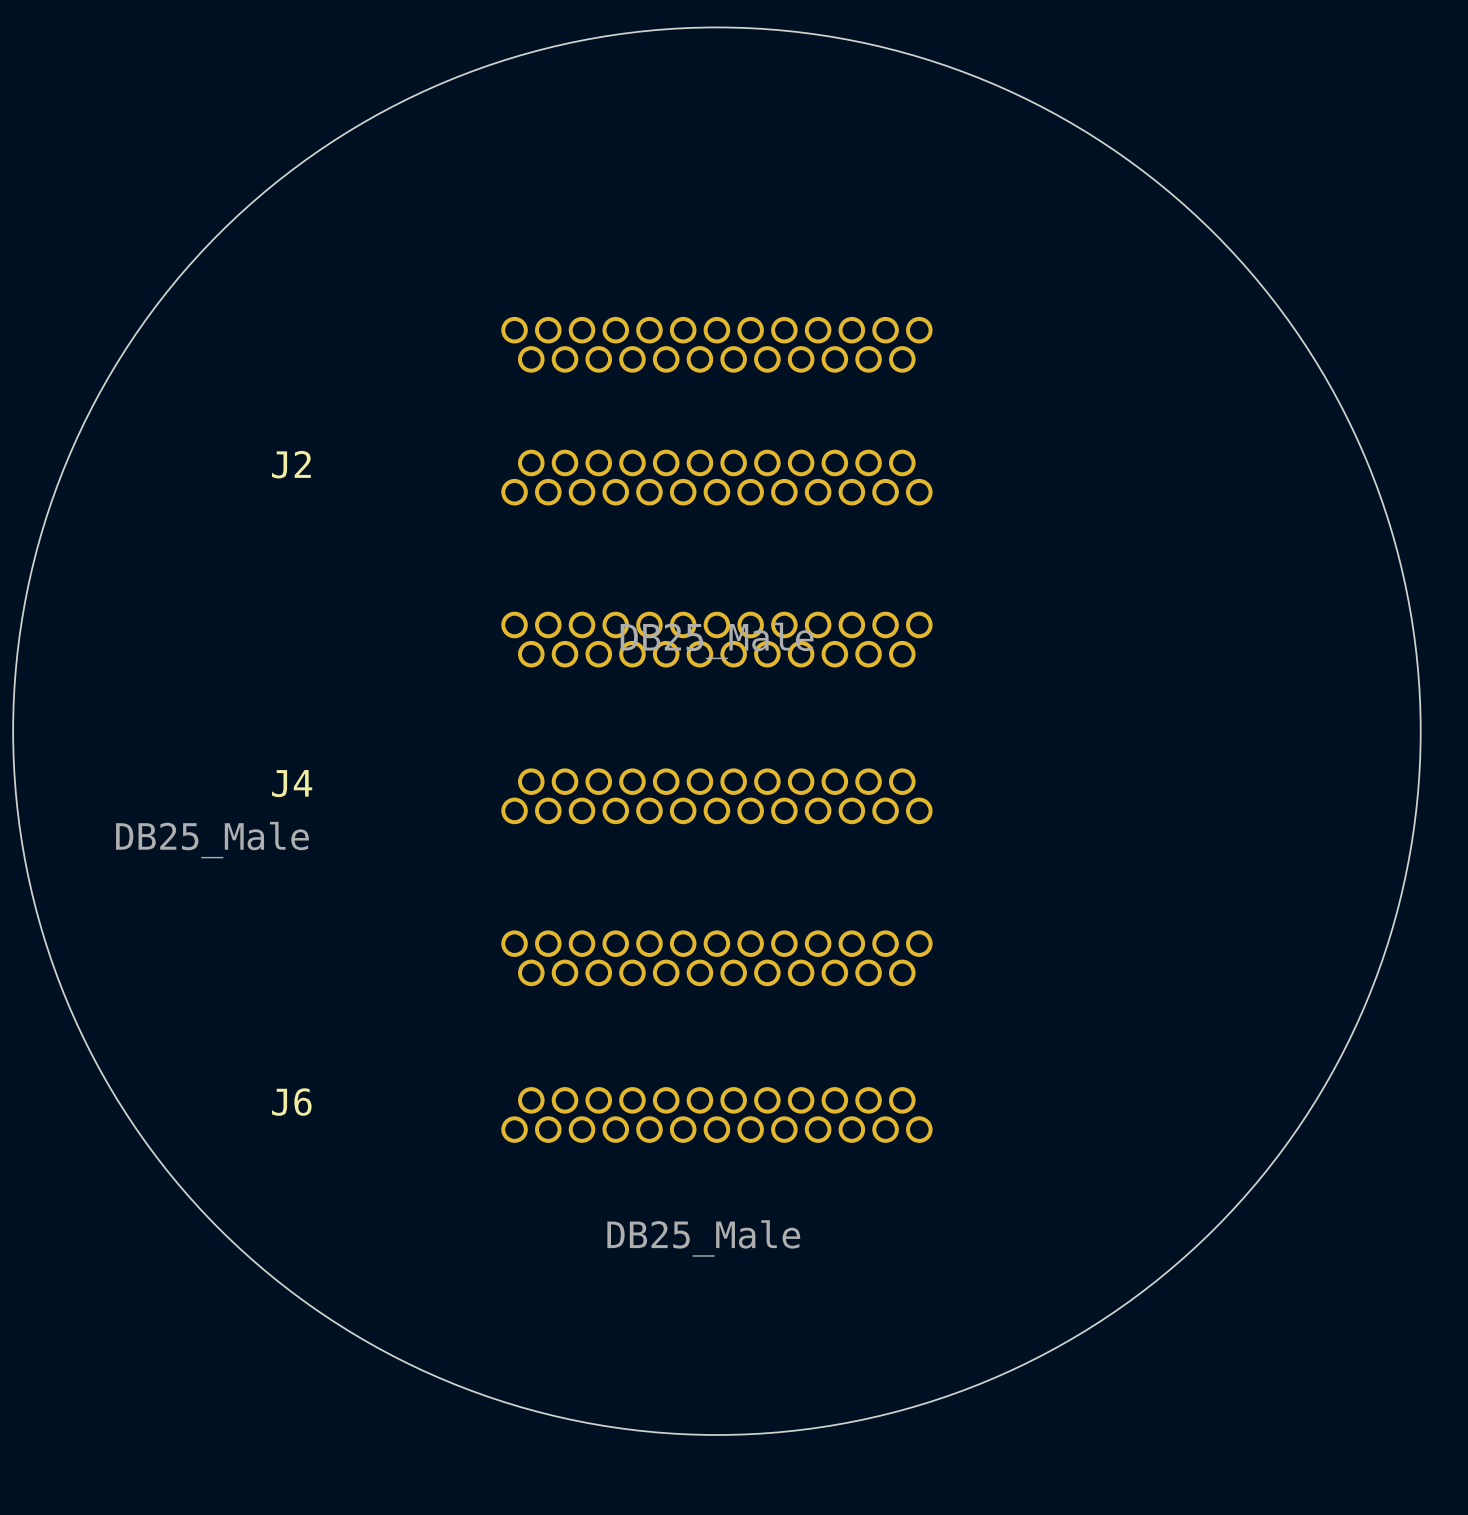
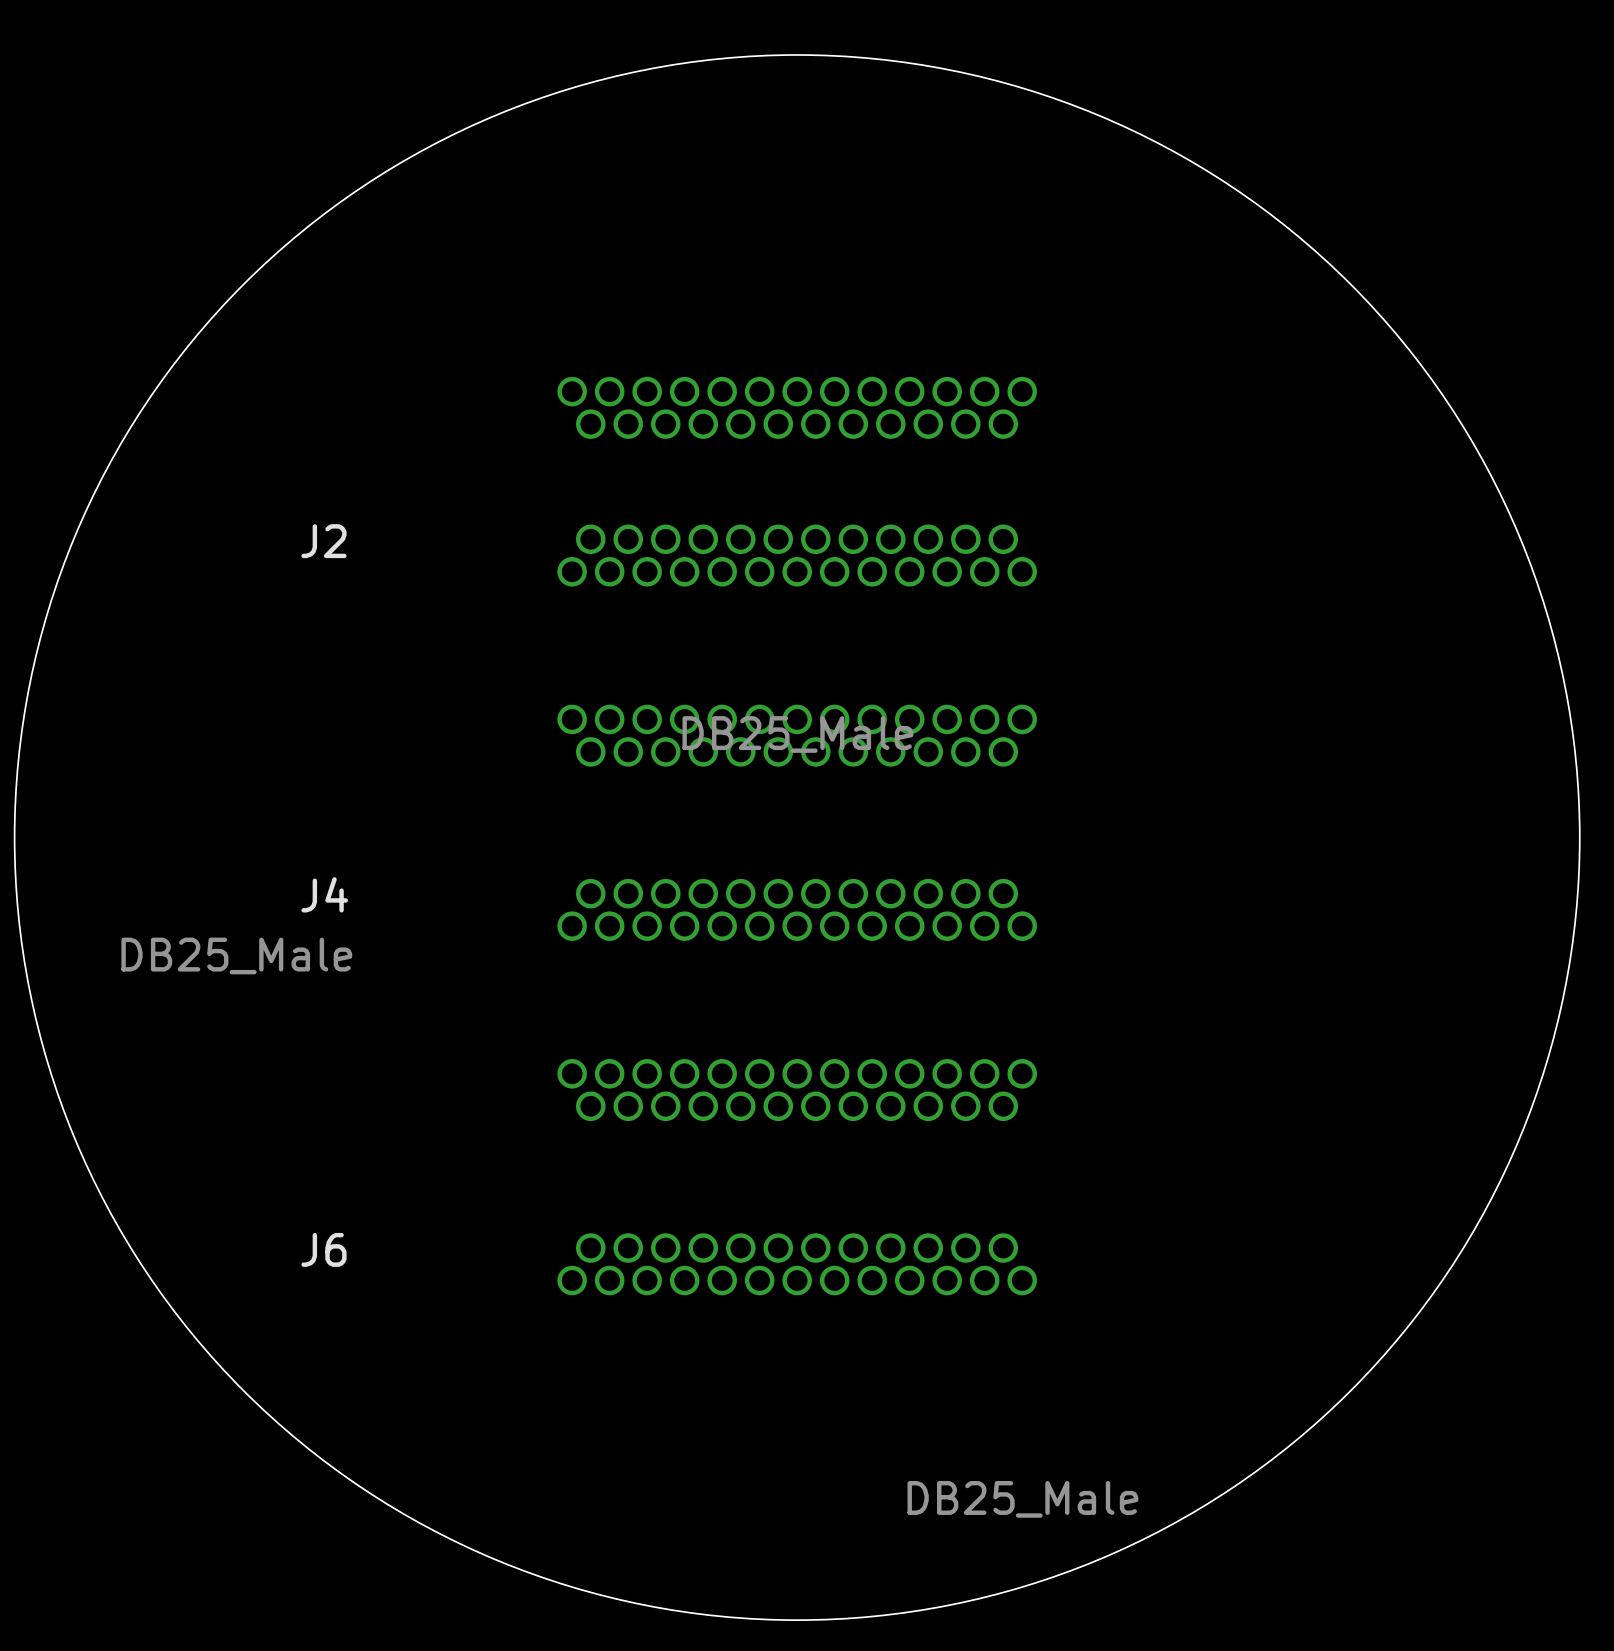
J6 value position: DB25_Male (703, 1238) -> DB25_Male (1022, 1499)

